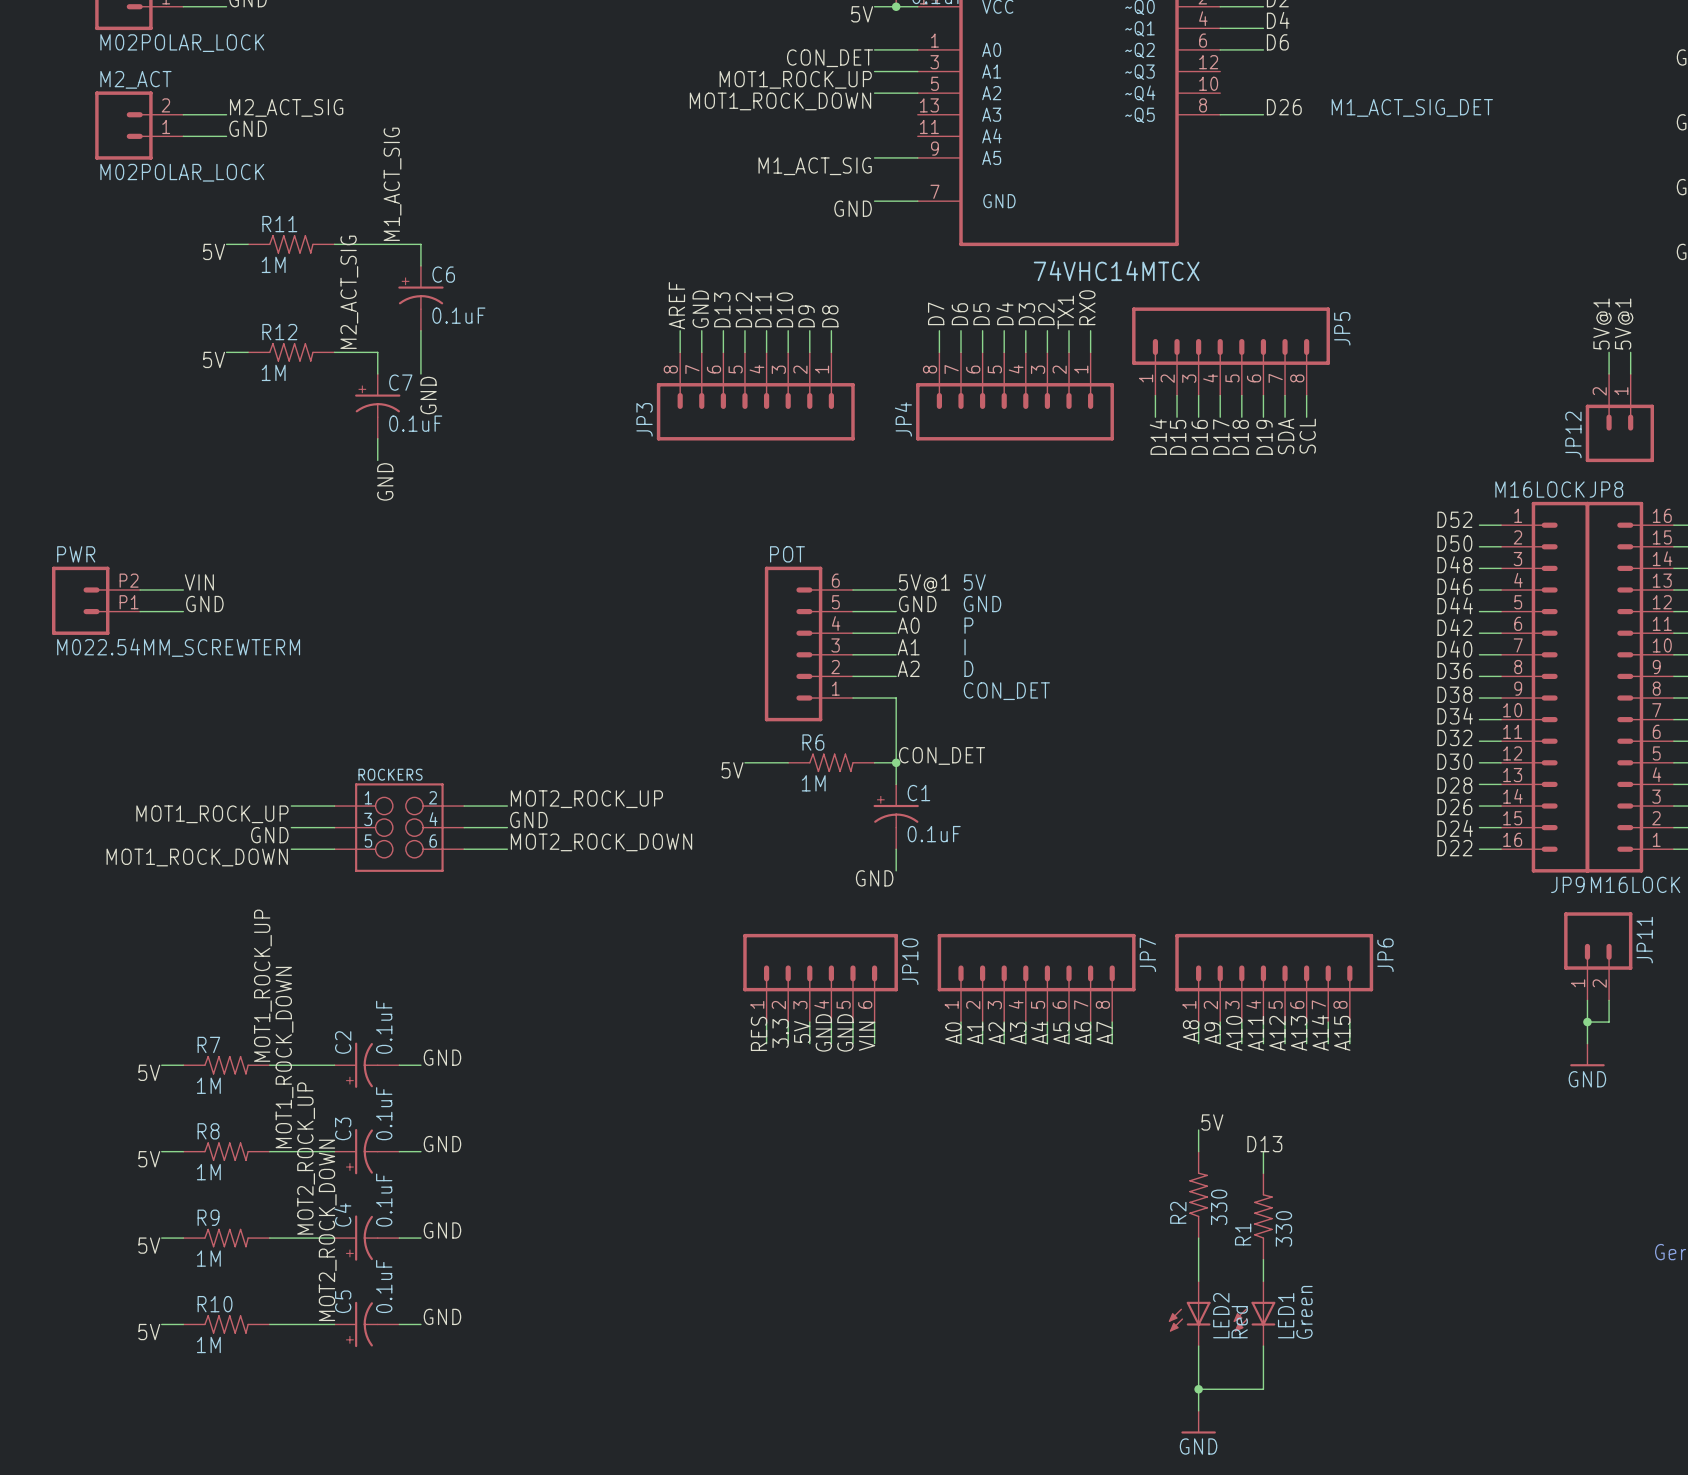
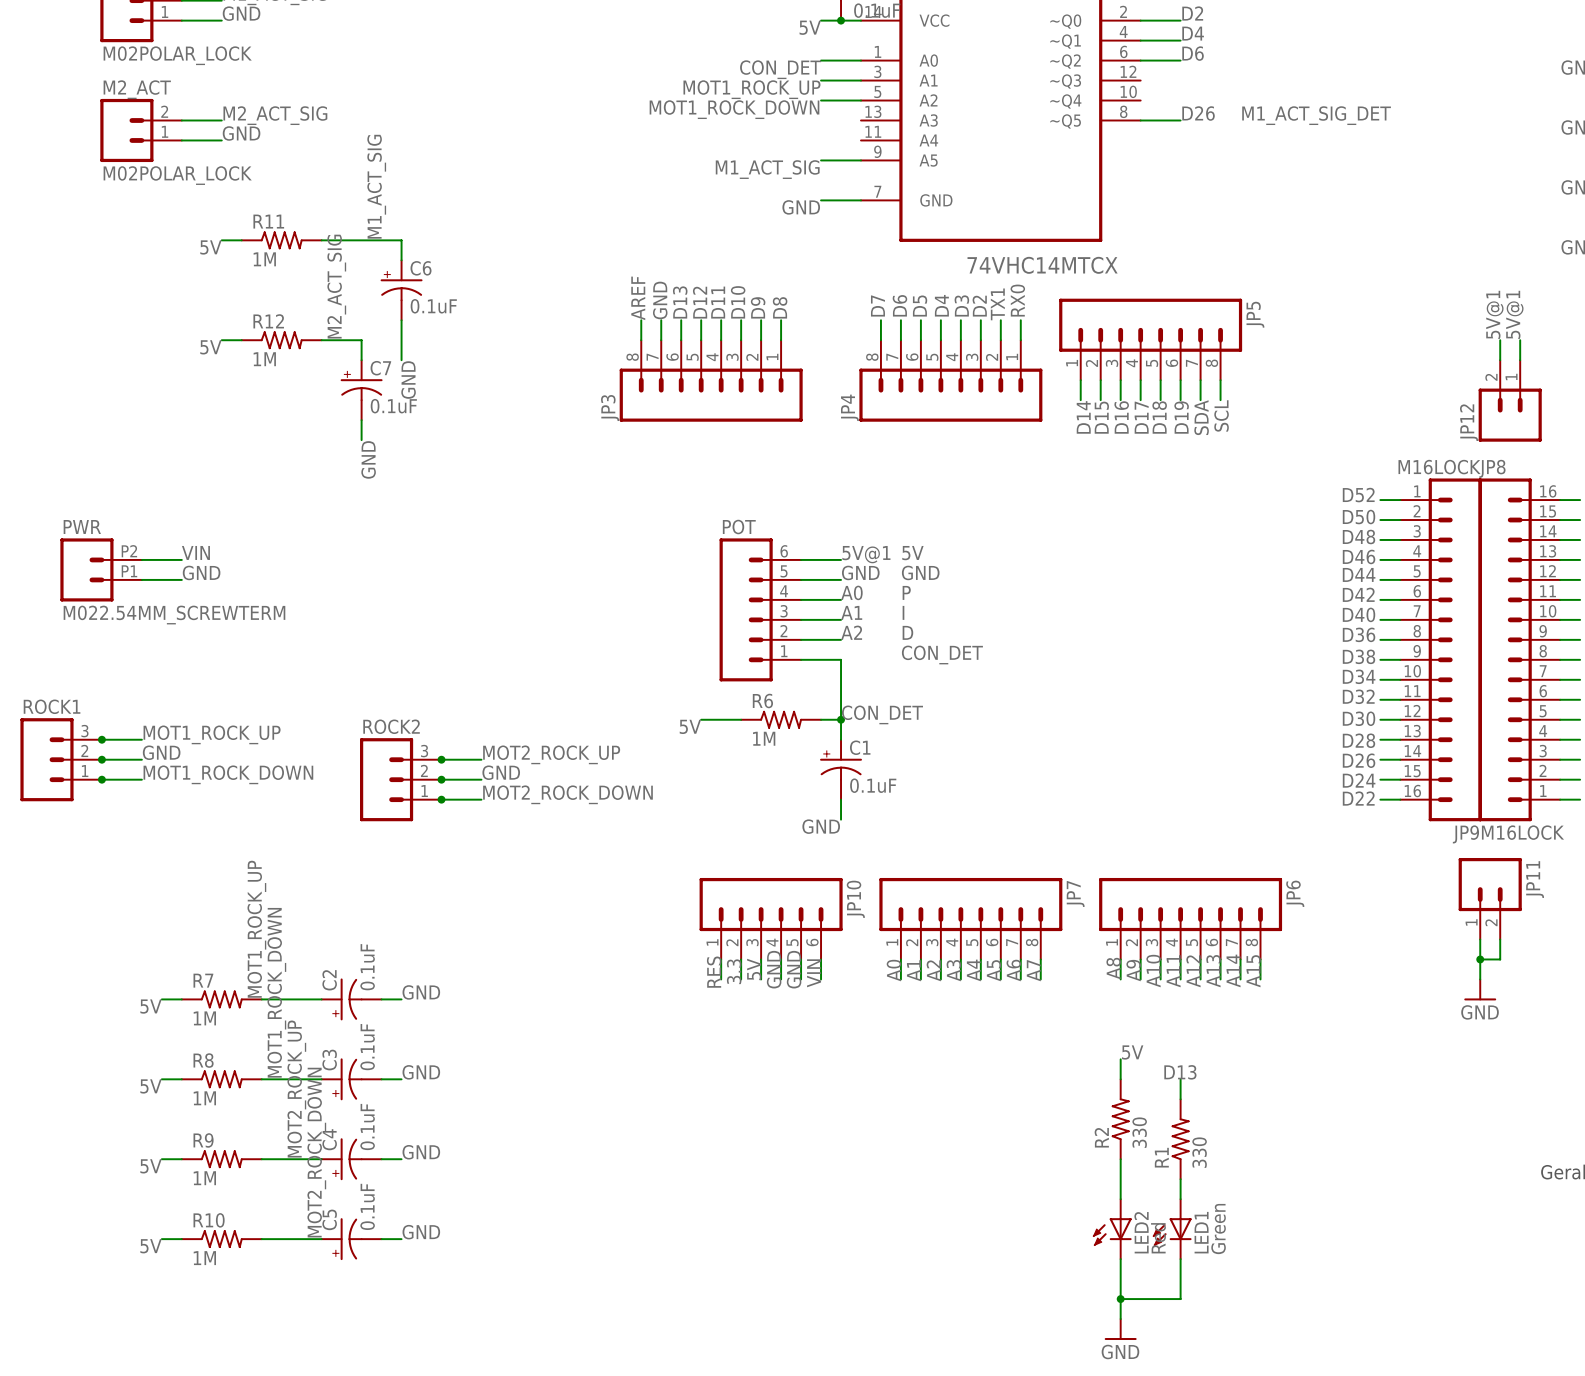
junction: none -> (101, 739)
ROCK1: none -> (61, 759)
junction: none -> (101, 759)
wire: (291, 806) (334, 806) -> (101, 739) (141, 739)
junction: none -> (441, 759)
label position: MOT1_ROCK_UP (212, 814) -> MOT1_ROCK_UP (212, 734)
junction: none -> (101, 779)
wire: (291, 827) (334, 827) -> (101, 759) (141, 759)
ROCKERS: (399, 827) -> none
ROCK2: none -> (400, 779)
junction: none -> (441, 779)
label position: GND (269, 835) -> GND (161, 752)
wire: (291, 849) (334, 849) -> (101, 779) (141, 779)
junction: none -> (441, 799)
label position: MOT1_ROCK_DOWN (197, 857) -> MOT1_ROCK_DOWN (228, 774)

